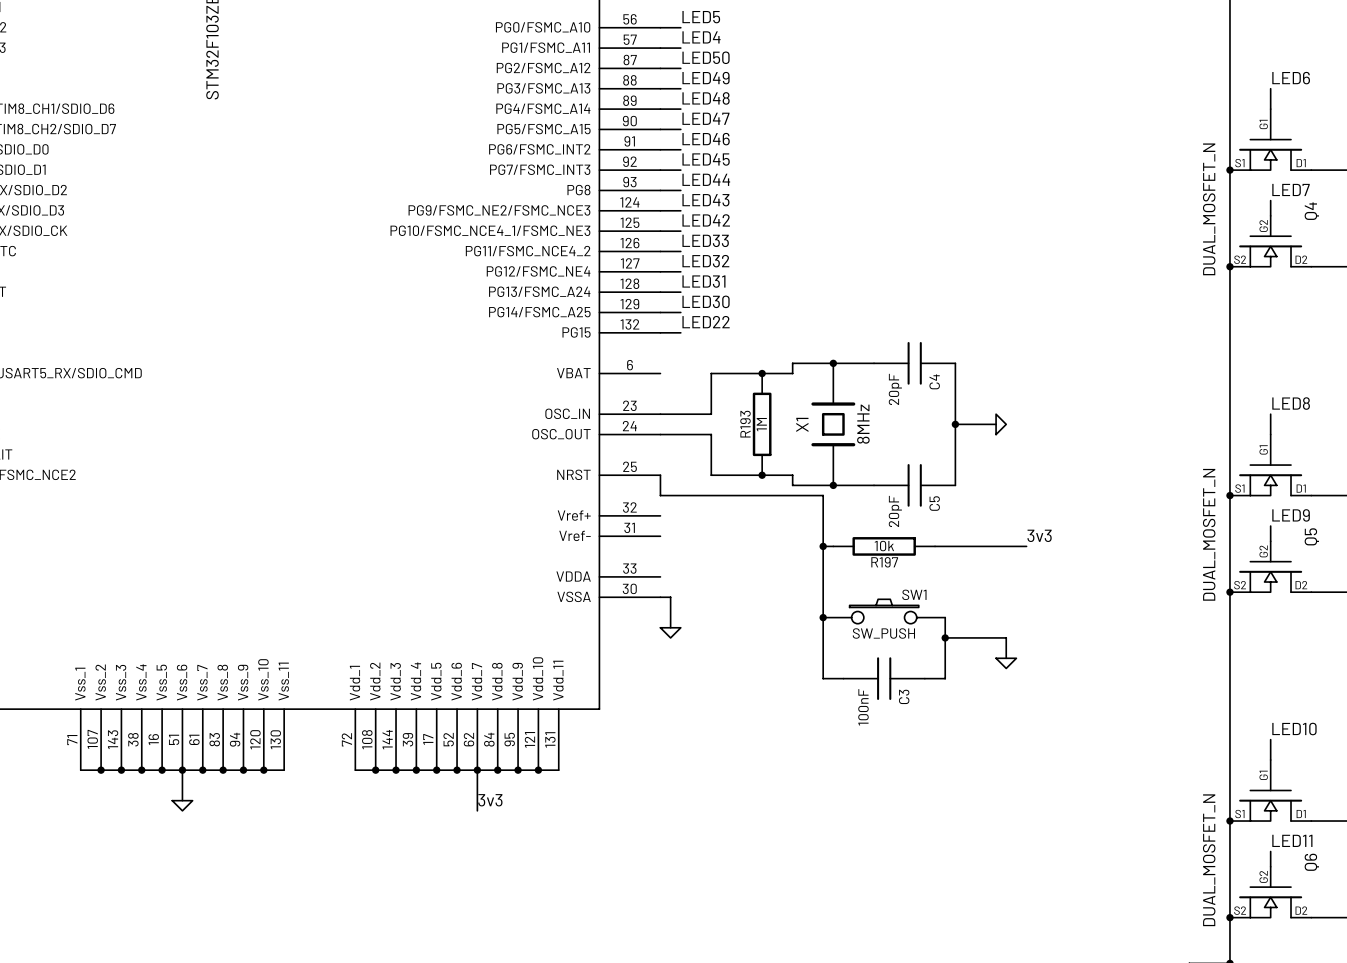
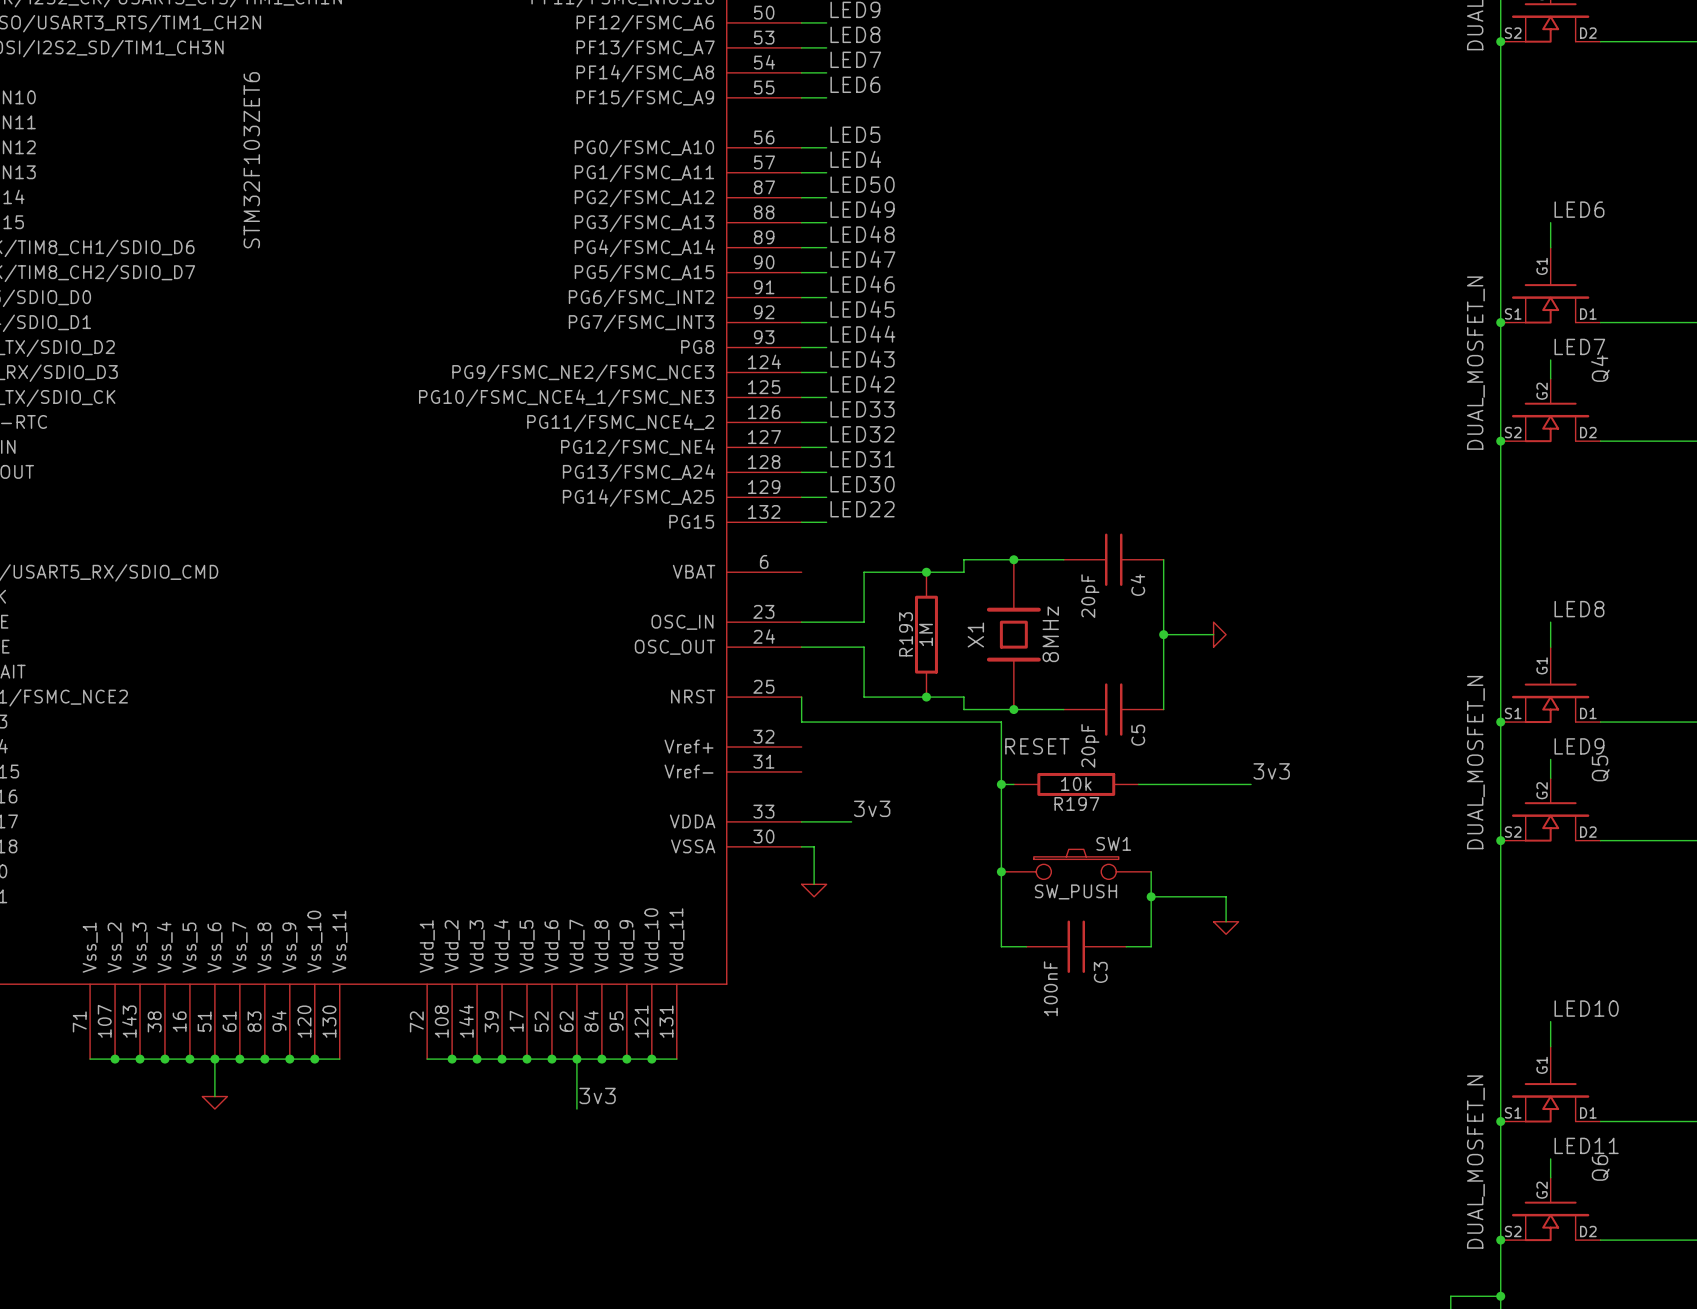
label: none -> RESET (1037, 746)
label: none -> 3v3 (872, 808)
wire: none -> (801, 821) (851, 821)

